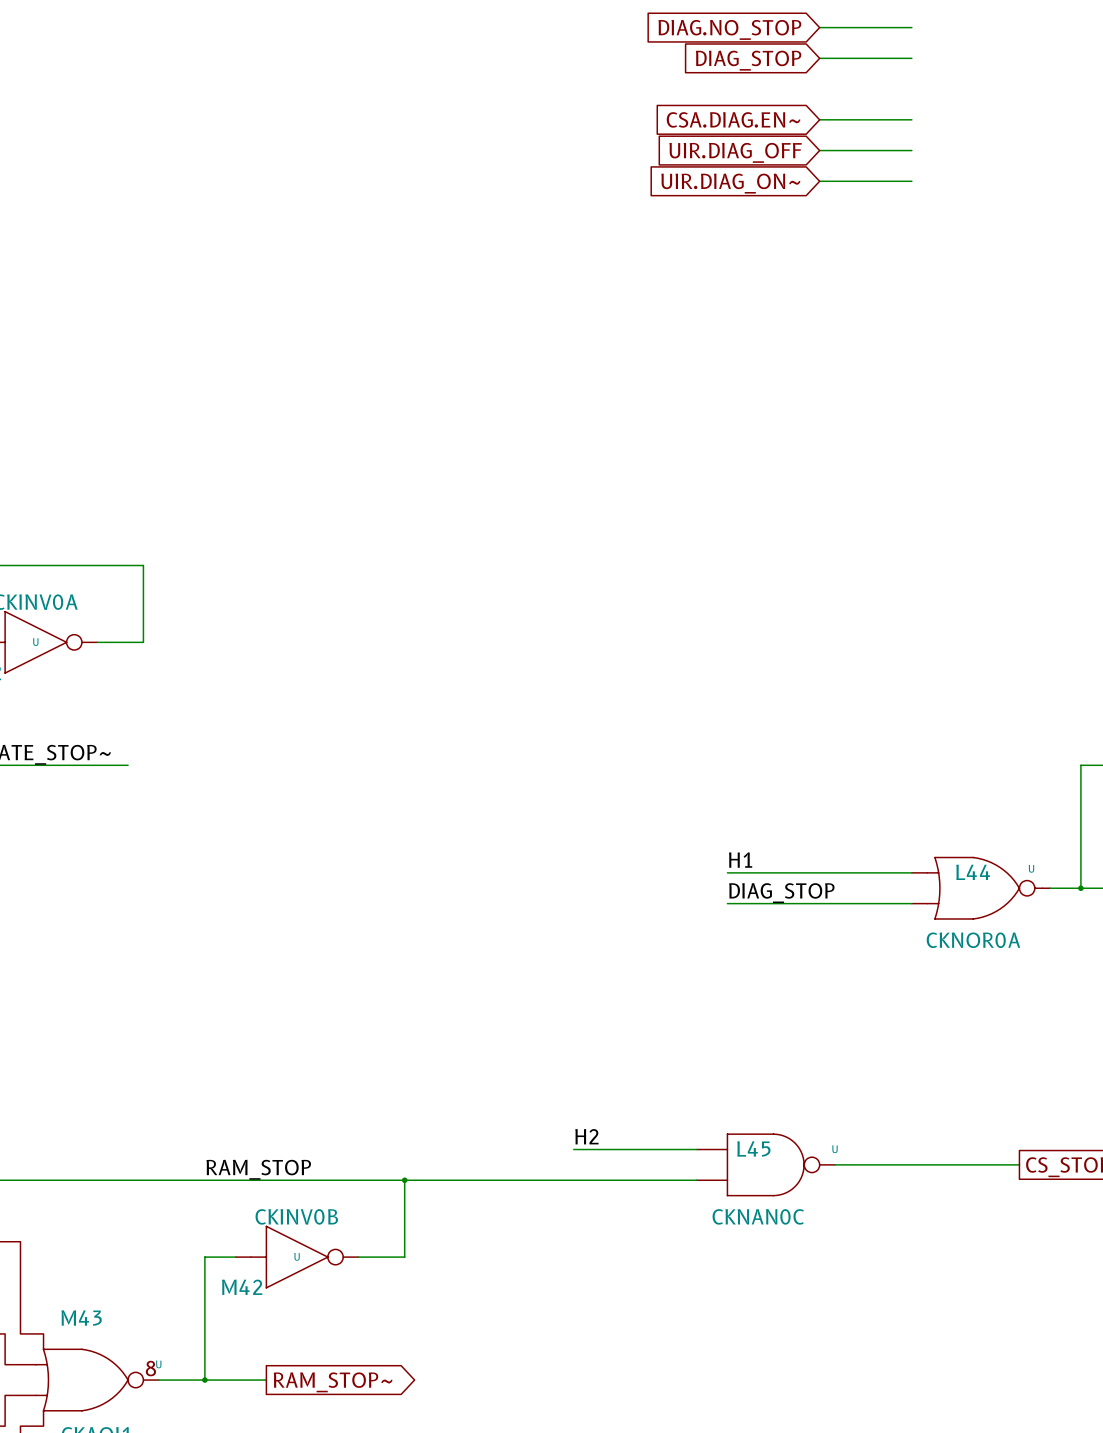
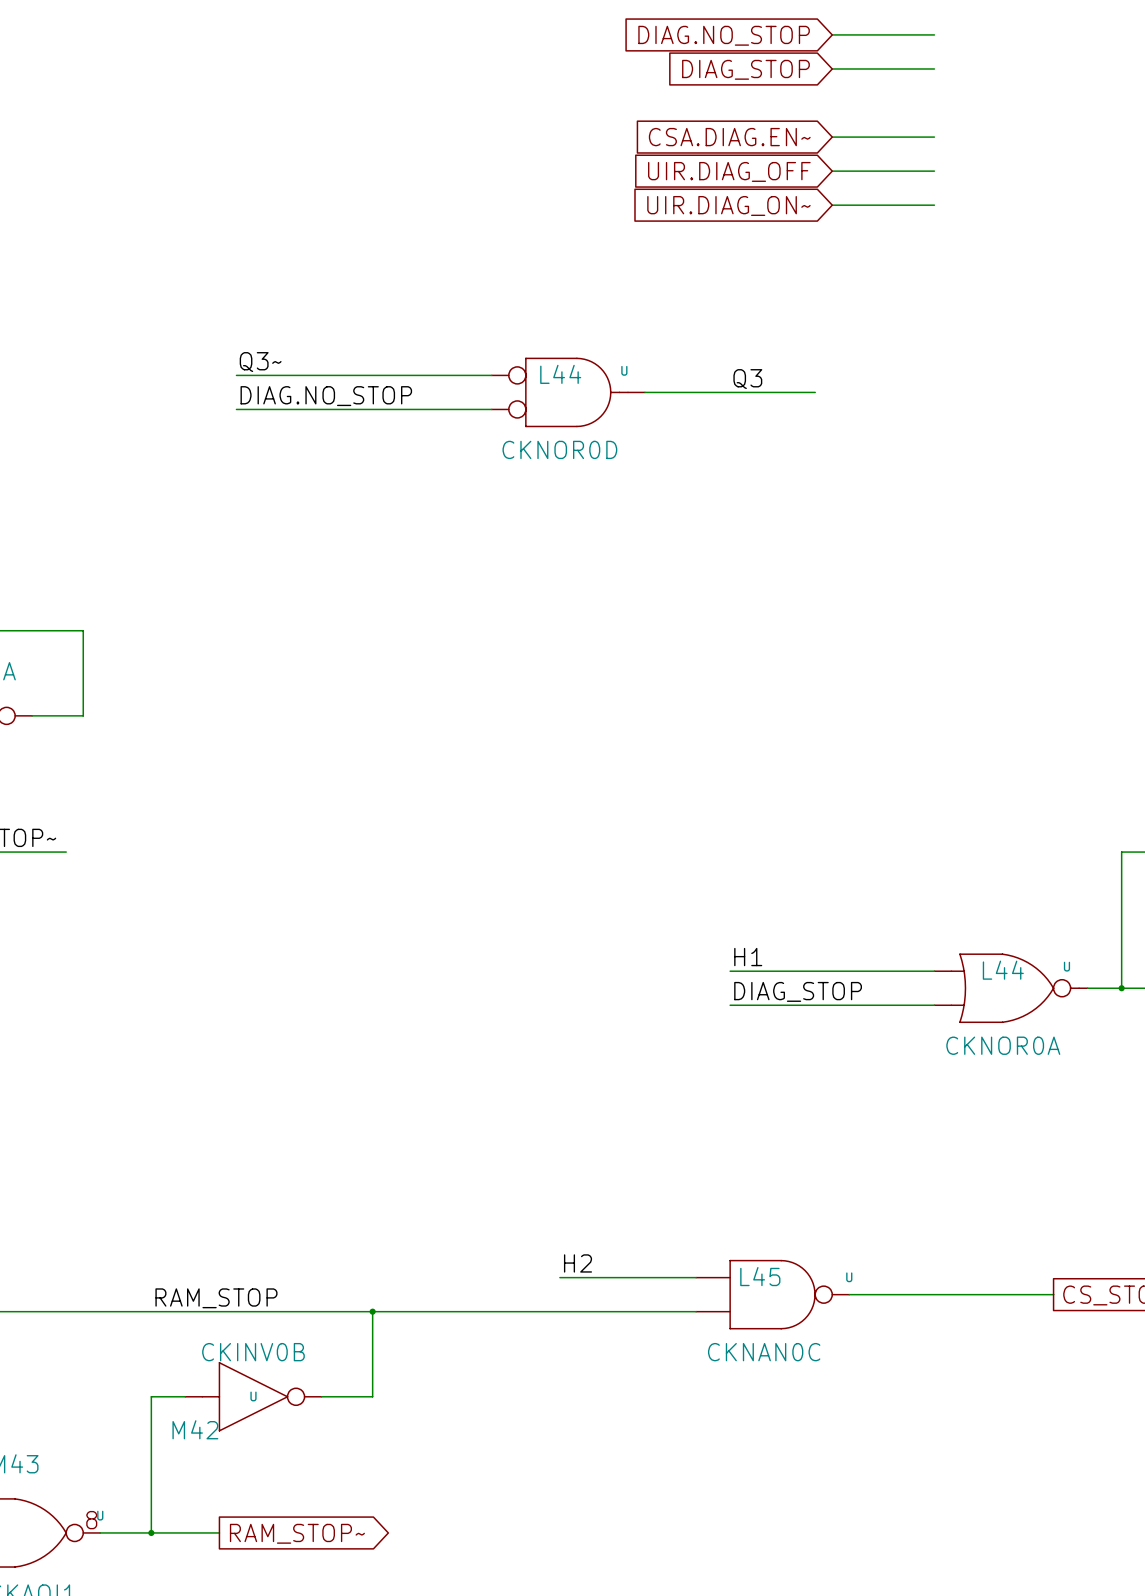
label: none -> Q3~ (260, 362)
wire: none -> (236, 375) (491, 375)
label: none -> Q3 (747, 379)
U: none -> (568, 392)
wire: none -> (645, 392) (815, 392)
label: none -> DIAG.NO_STOP (326, 396)
wire: none -> (236, 409) (491, 409)

